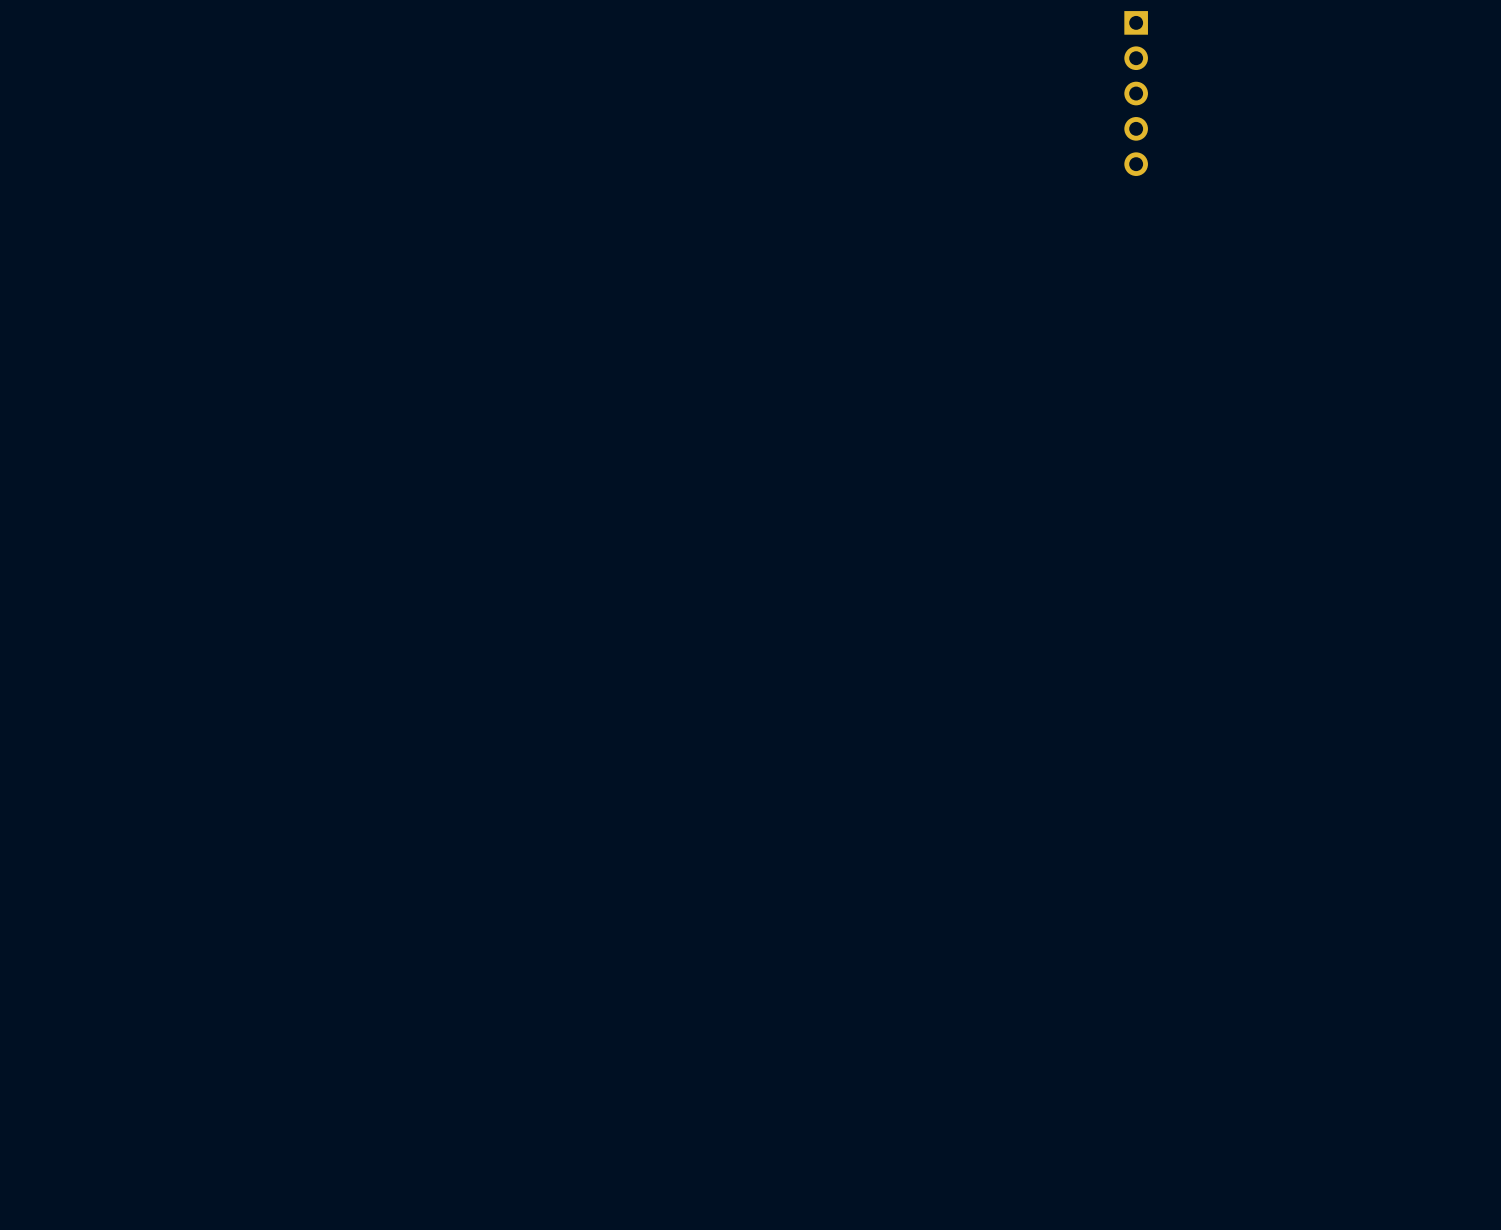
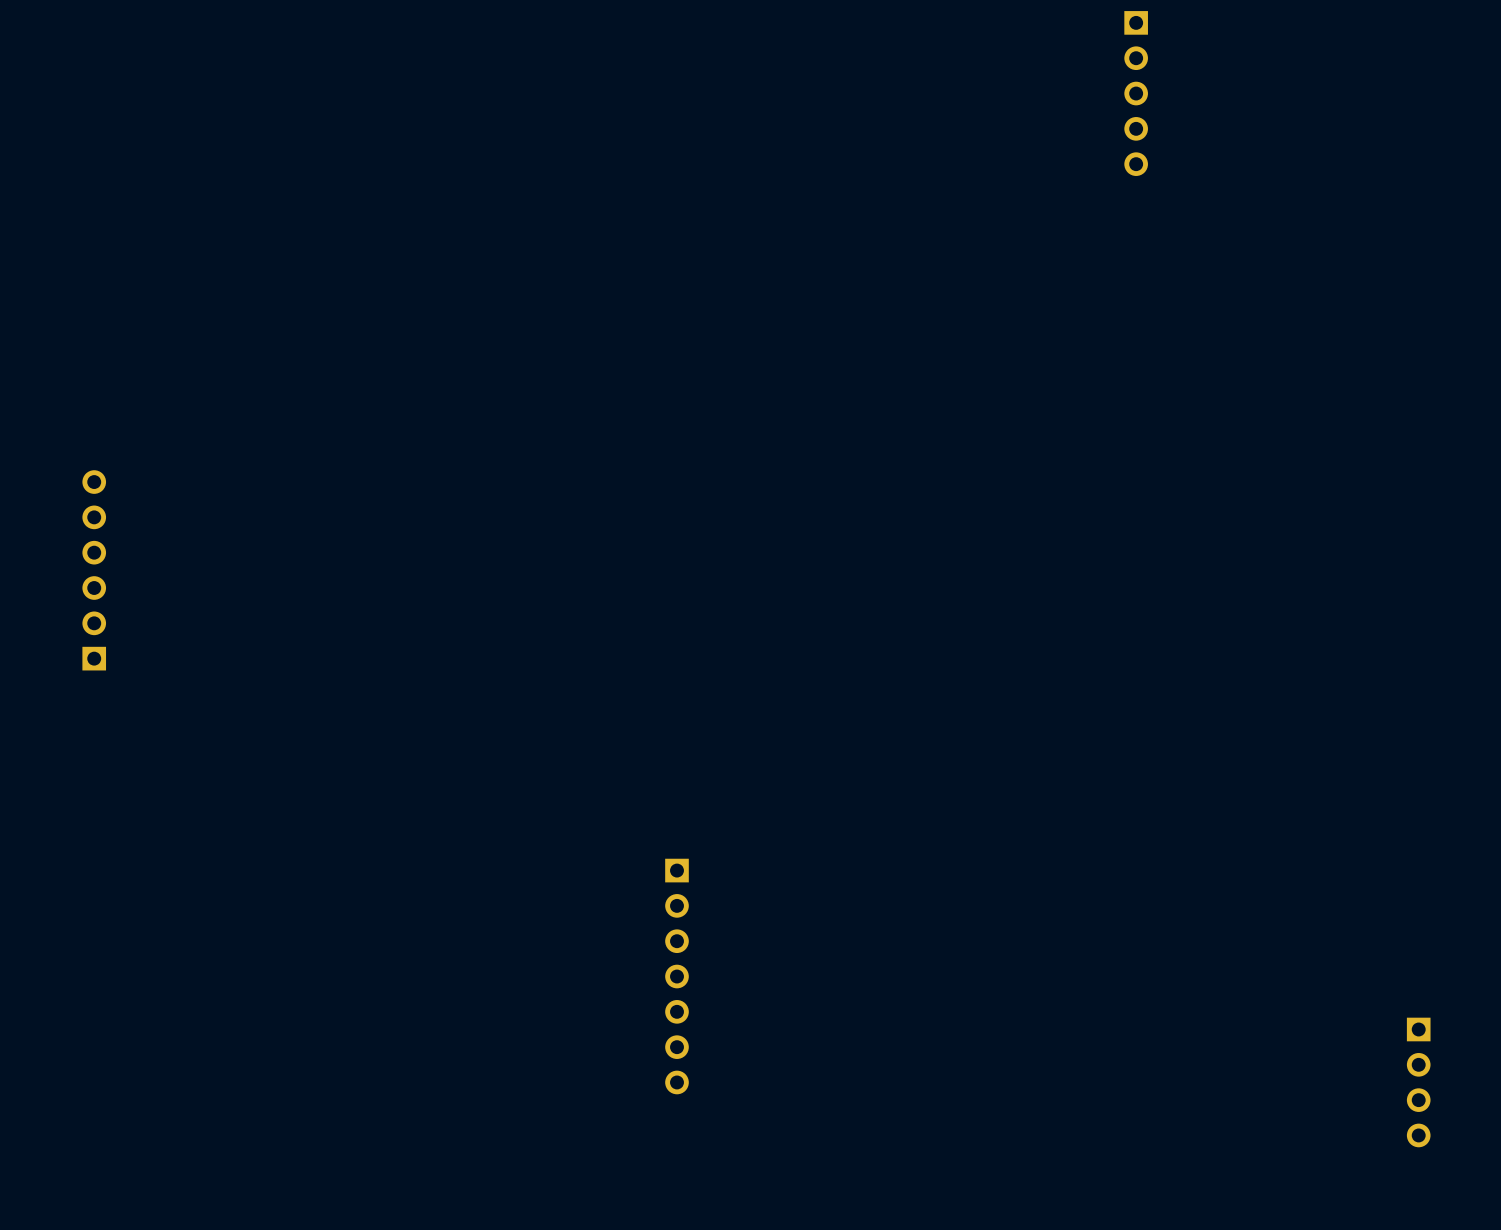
part: none -> (94, 570)
part: none -> (676, 976)
part: none -> (1418, 1082)

